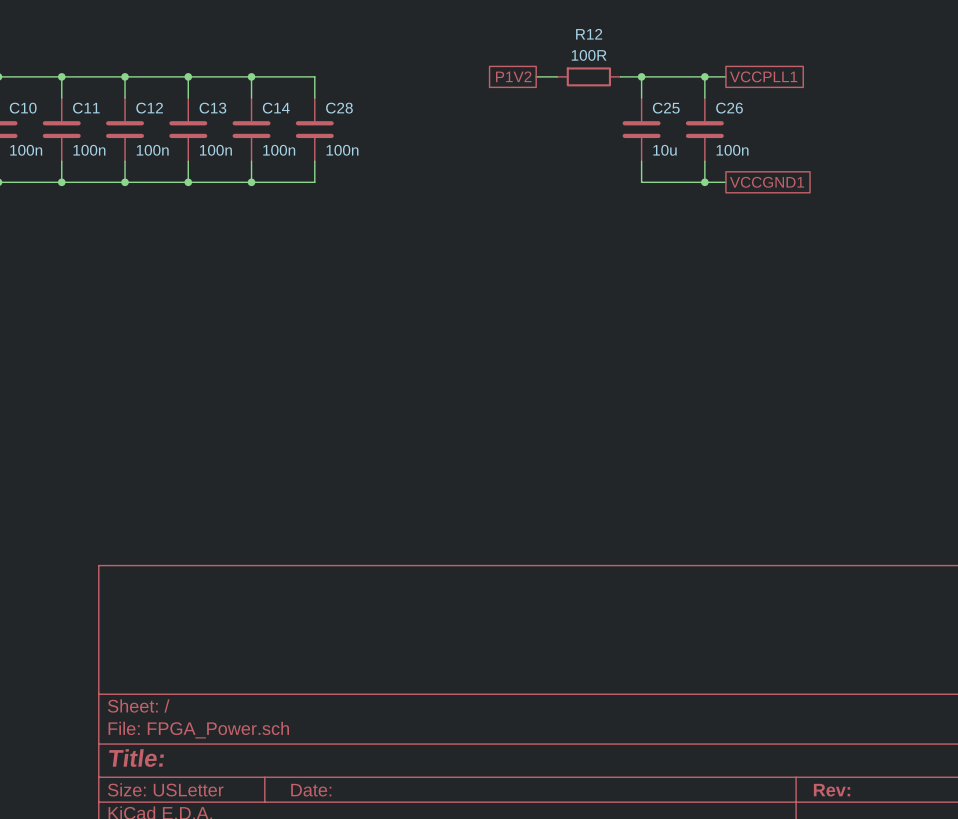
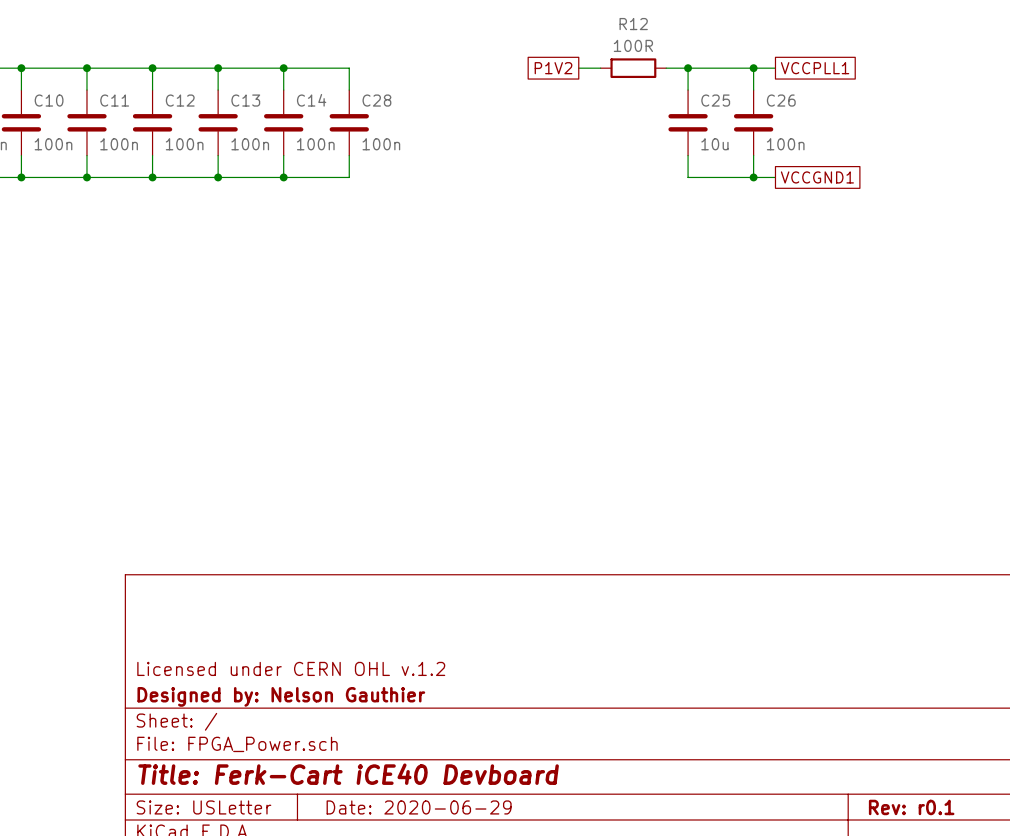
title block: none -> Licensed under CERN OHL v.1.2 (291, 668)
title block: none -> Designed by: Nelson Gauthier (281, 696)
title block: Title: (136, 758) -> Title: Ferk-Cart iCE40 Devboard (348, 774)
title block: Date: (311, 790) -> Date: 2020-06-29 (419, 807)
title block: Rev: (832, 790) -> Rev: r0.1 (911, 807)

